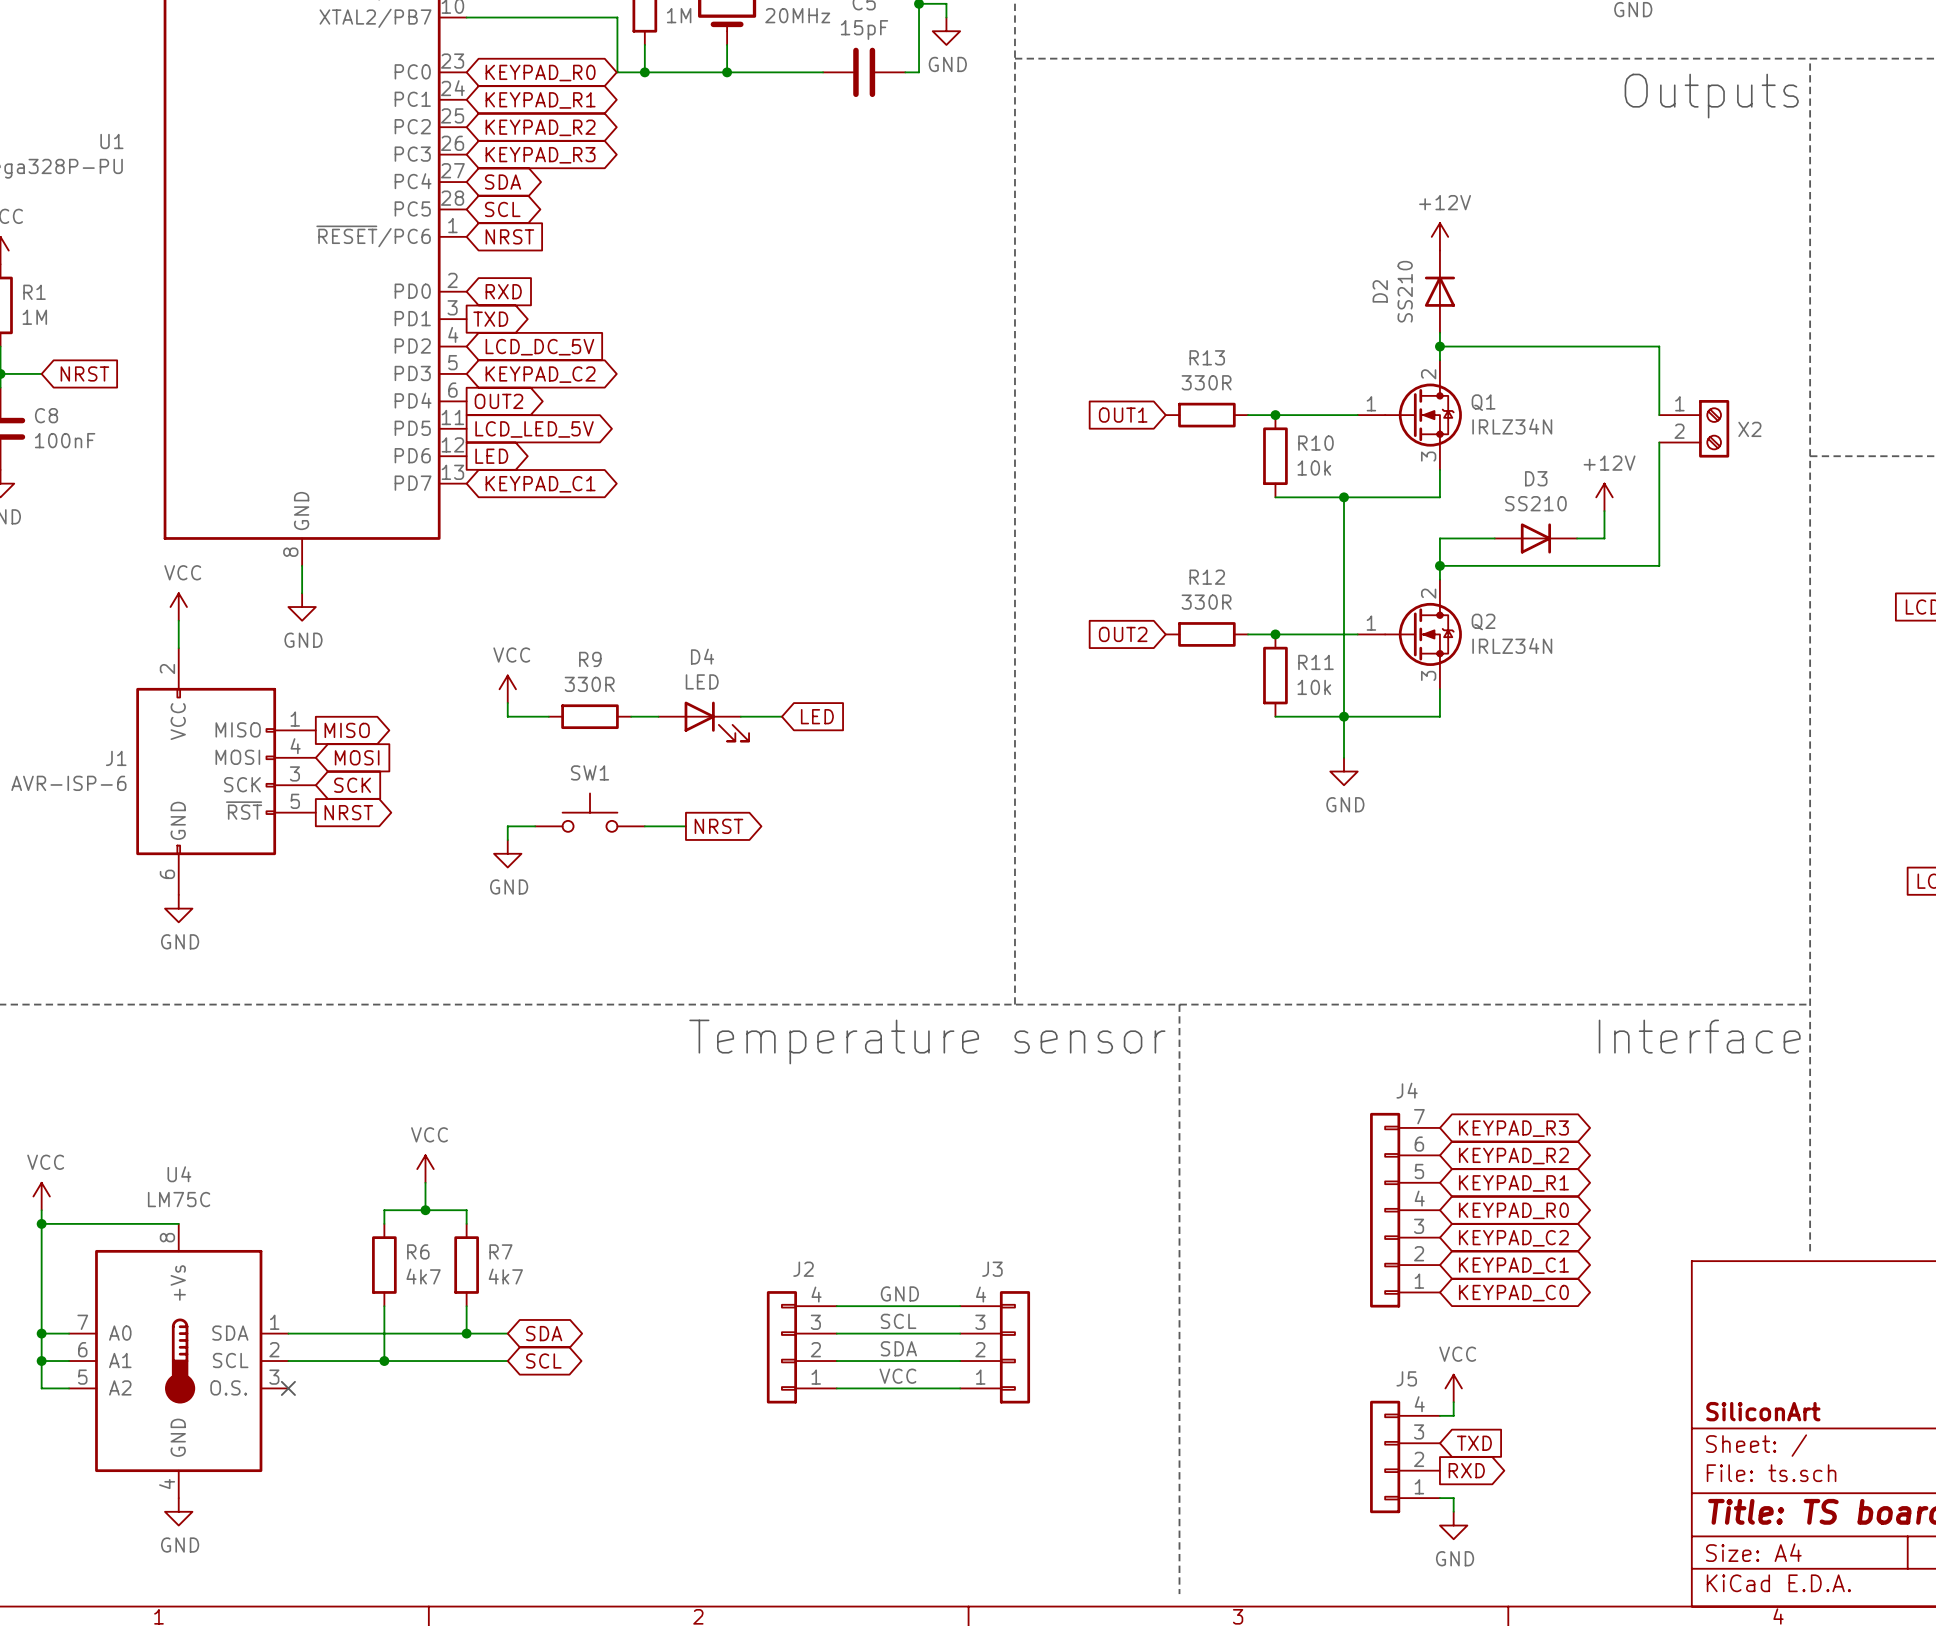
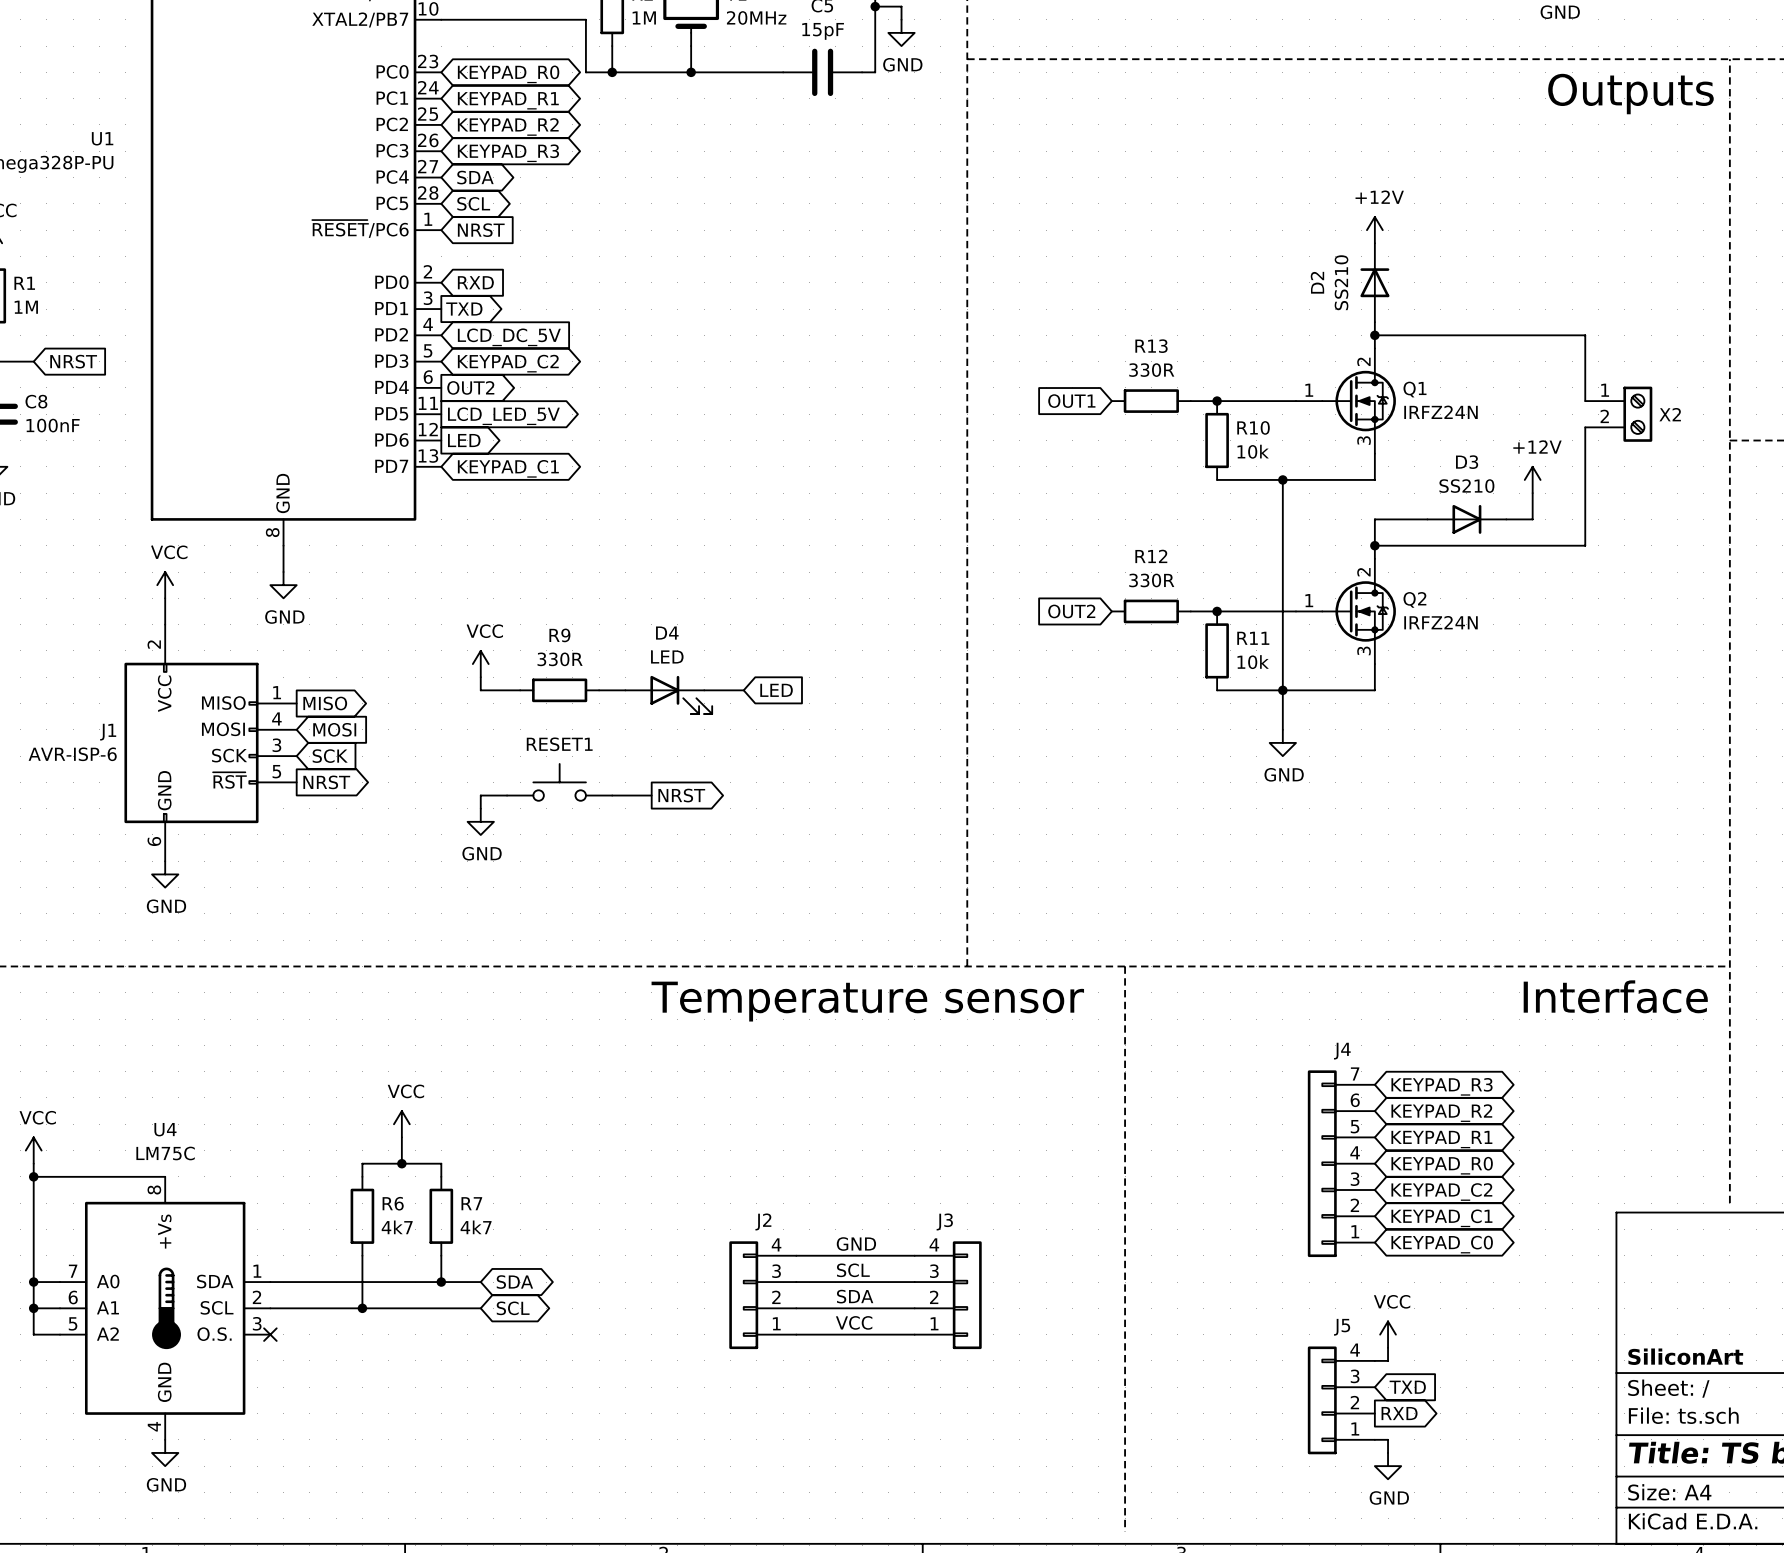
Q1 value: IRLZ34N (1512, 426) -> IRFZ24N (1441, 412)
Q2 value: IRLZ34N (1512, 645) -> IRFZ24N (1441, 622)
SW1 name: SW1 (590, 772) -> RESET1 (559, 744)

